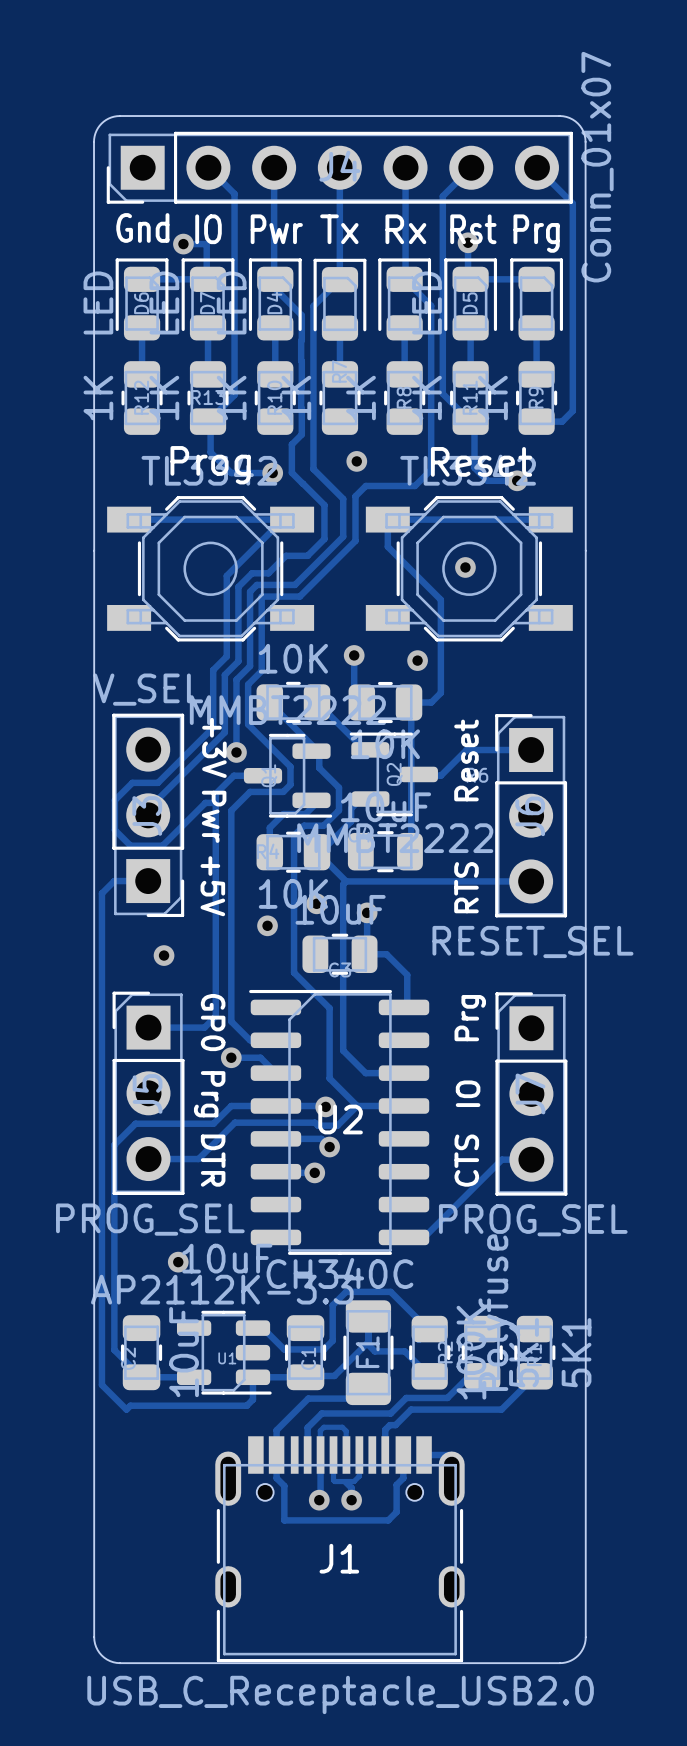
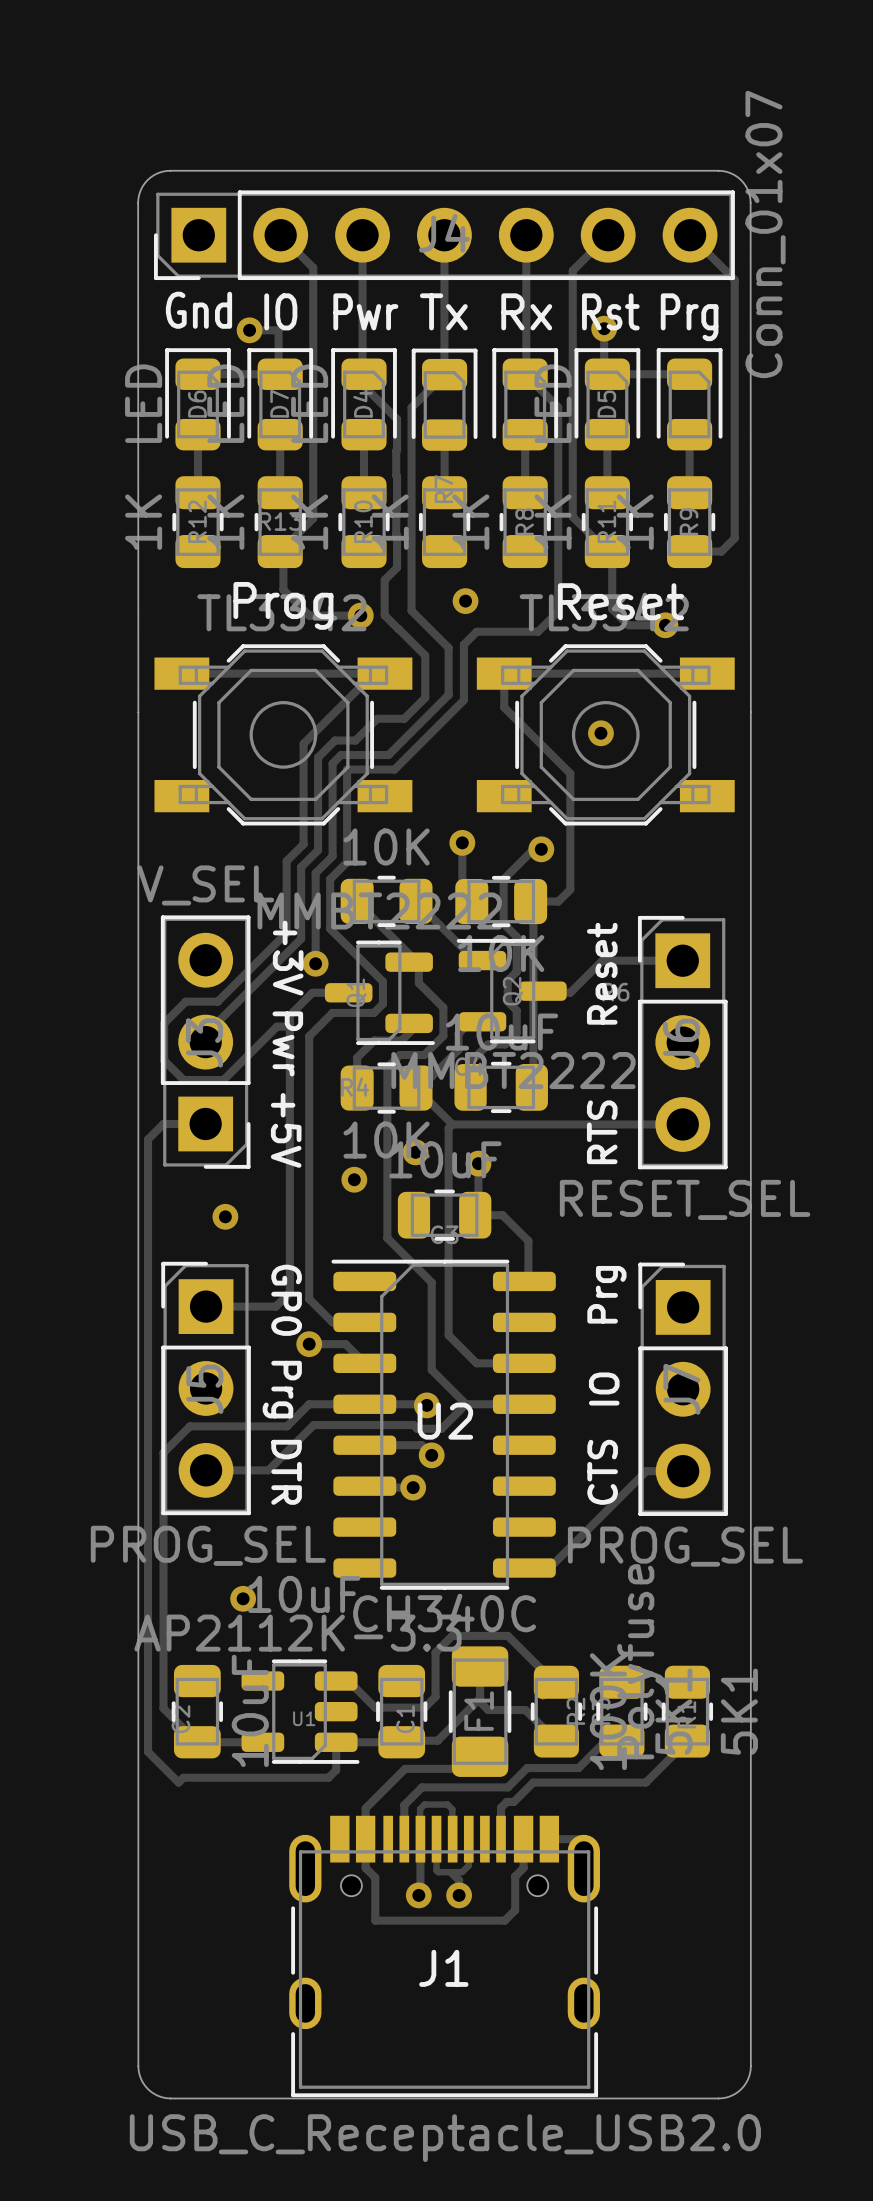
track: none -> (533, 849) (503, 879) (503, 923) (516, 936) (516, 971) (507, 980) (507, 1001) (516, 1010) (516, 1032) (505, 1044) (488, 1044) (470, 1061) (470, 1087)

